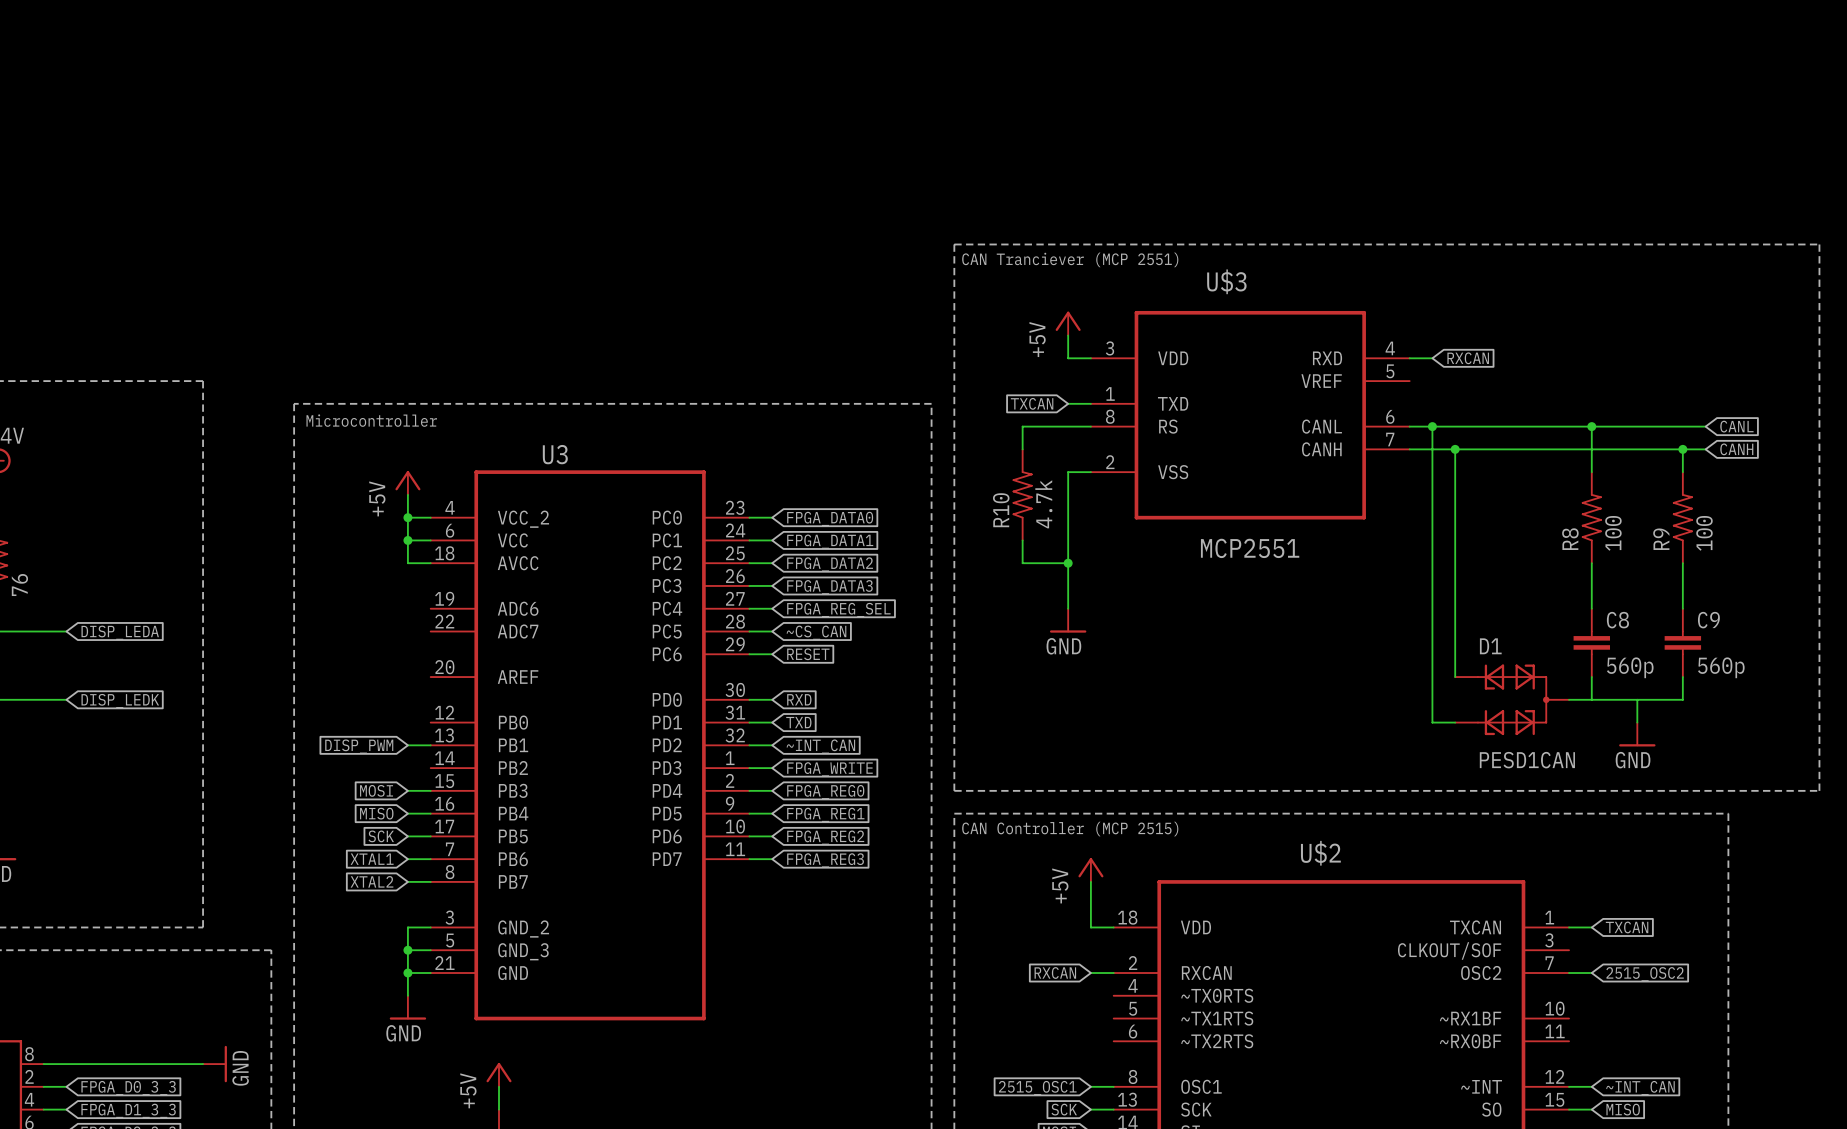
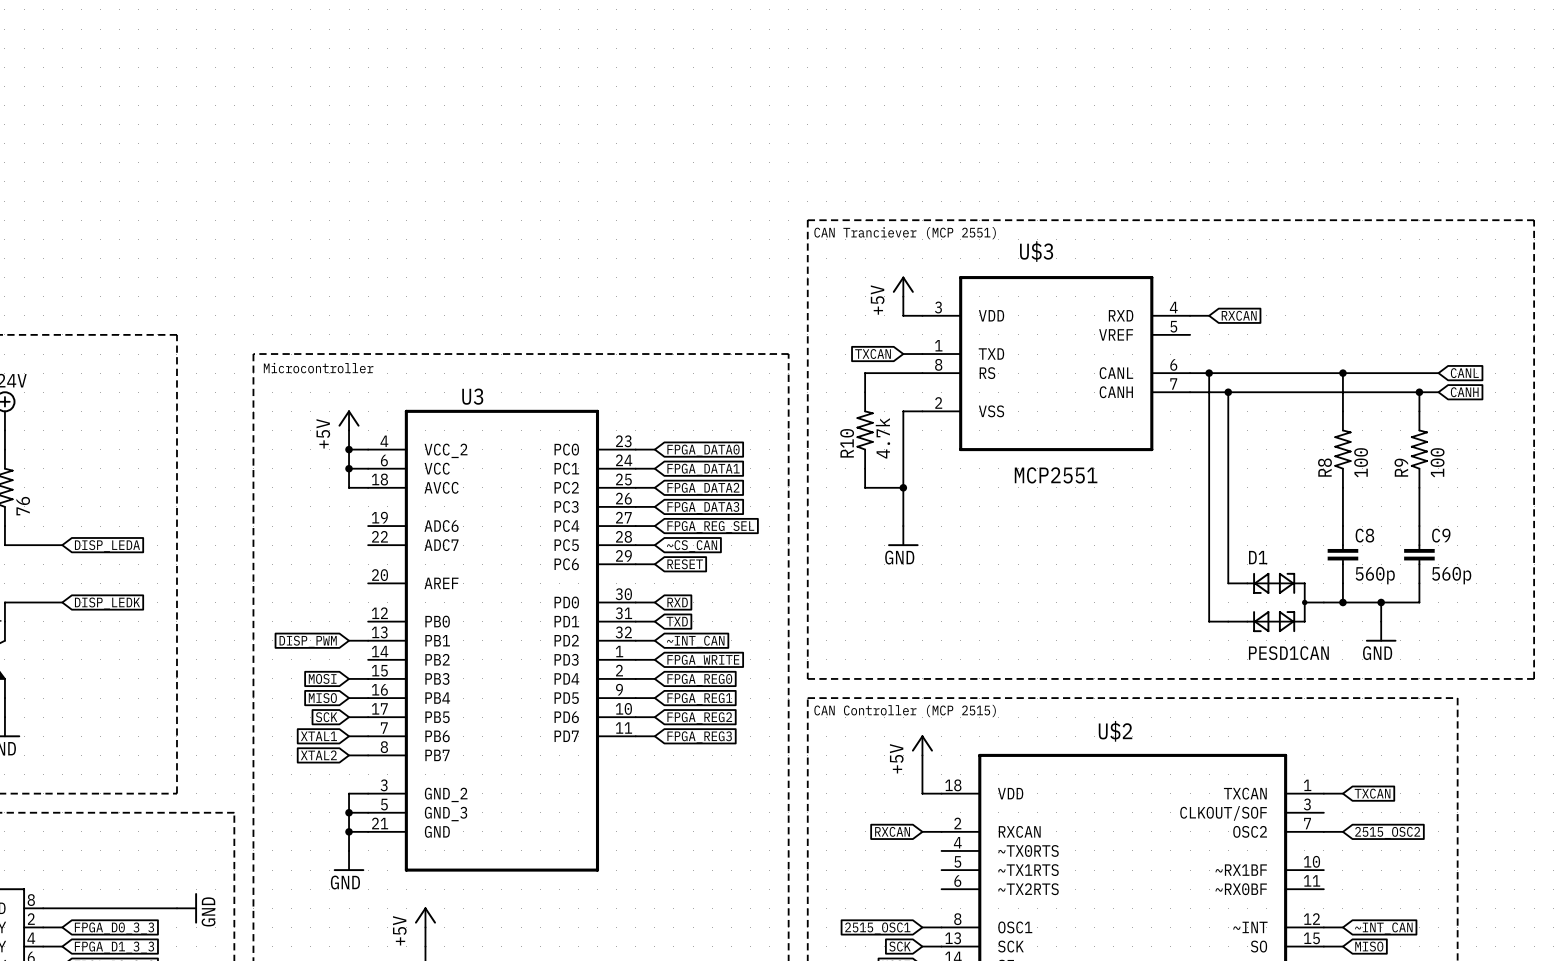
junction: none -> (1342, 602)
junction: none -> (1381, 602)

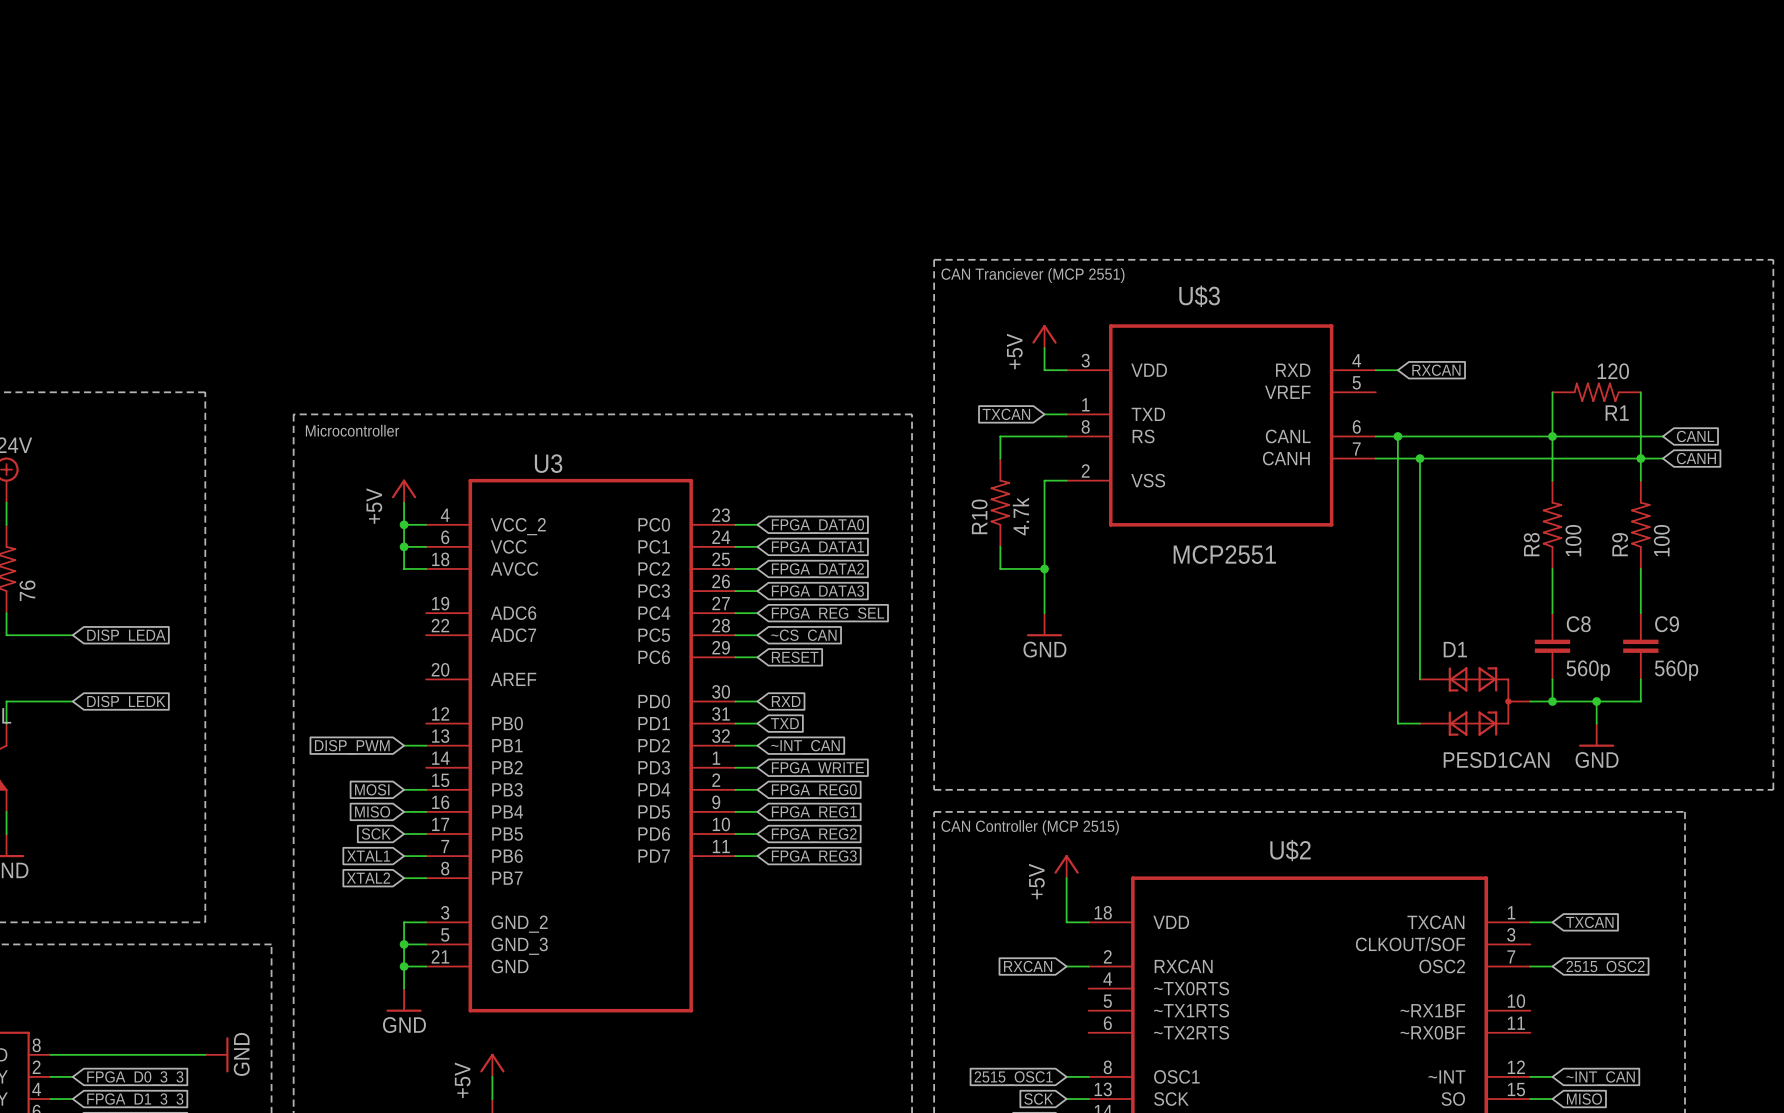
wire: none -> (1552, 392) (1552, 436)
R1: none -> 120 (1596, 392)
wire: none -> (1640, 392) (1640, 458)

